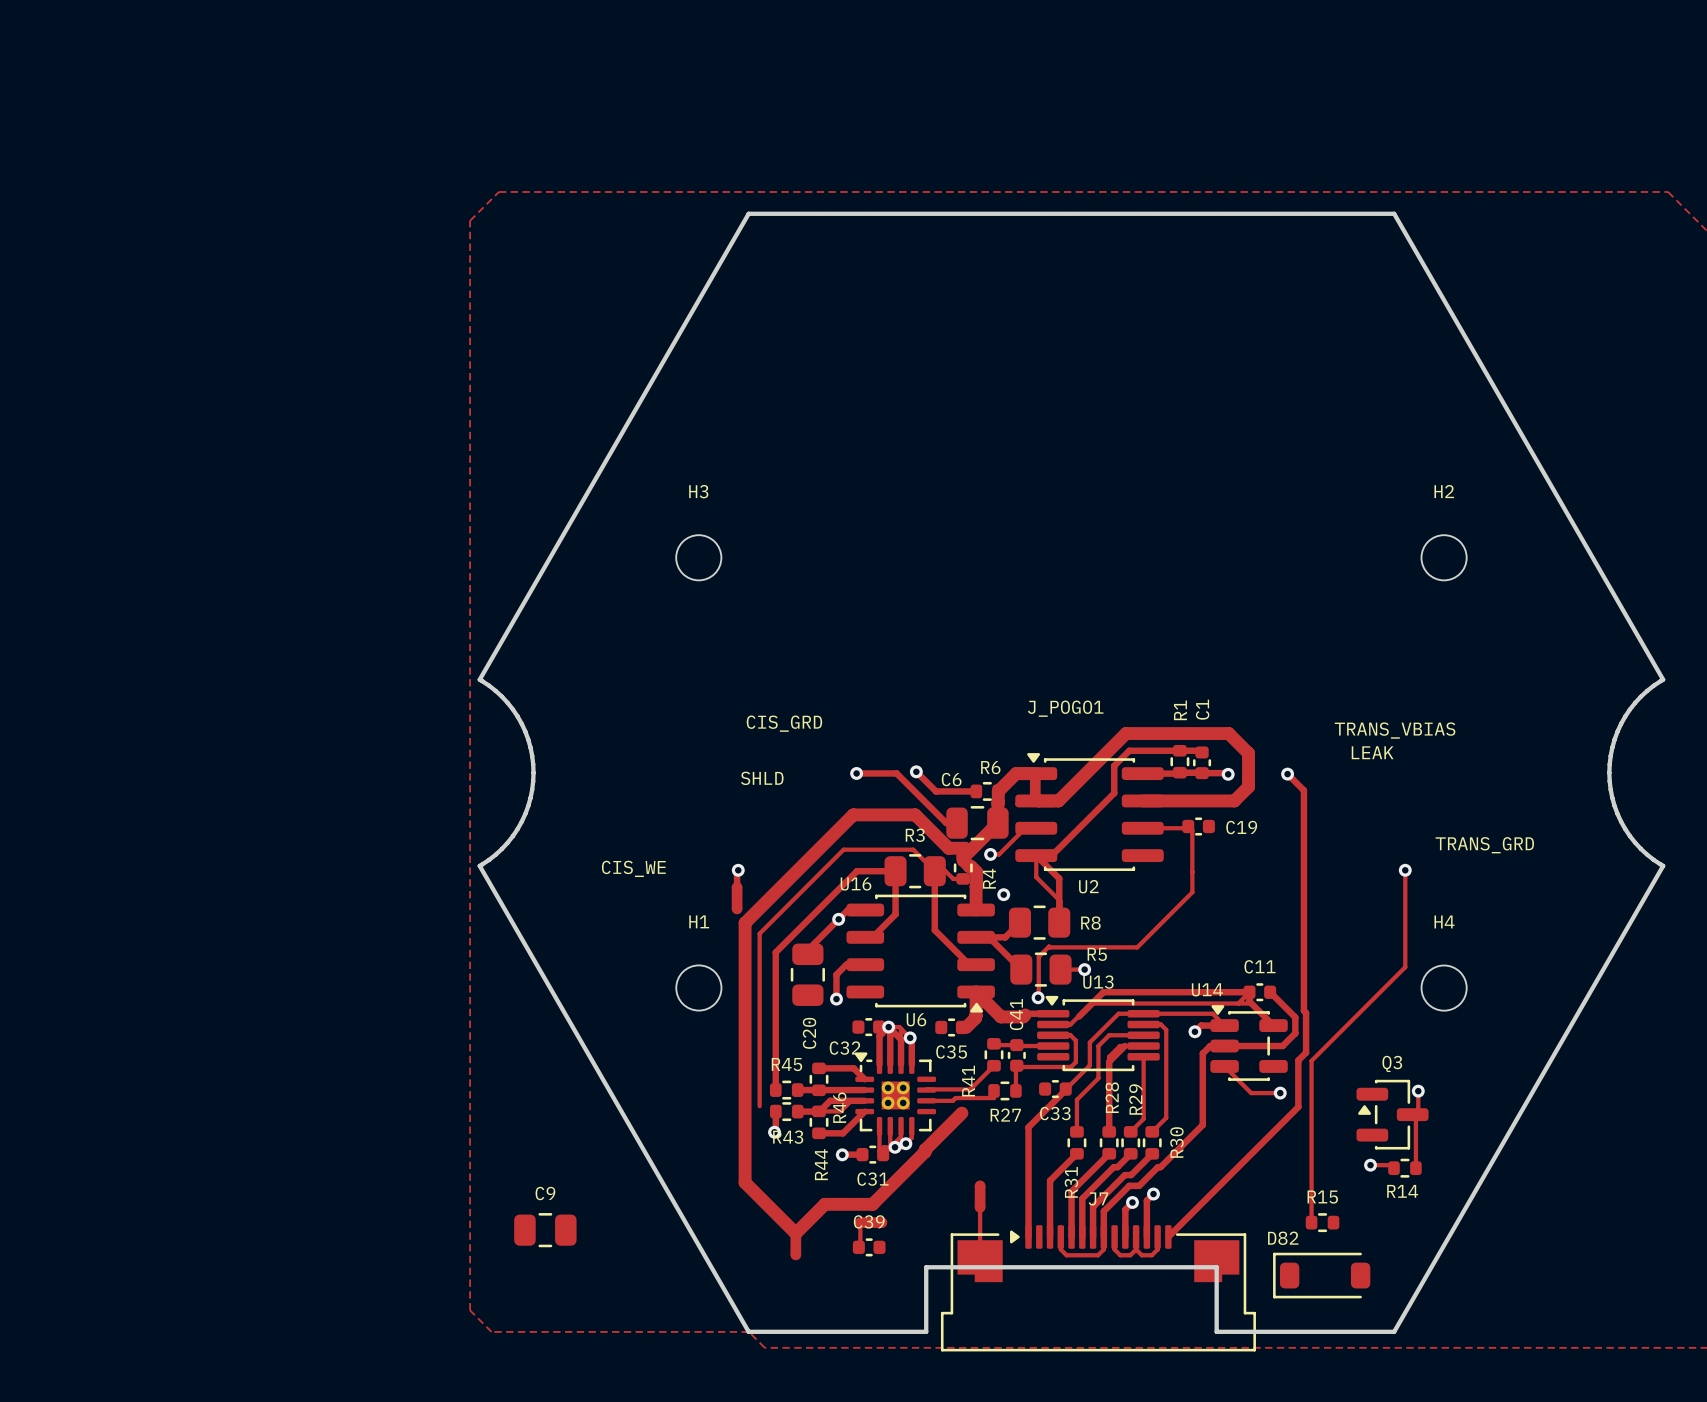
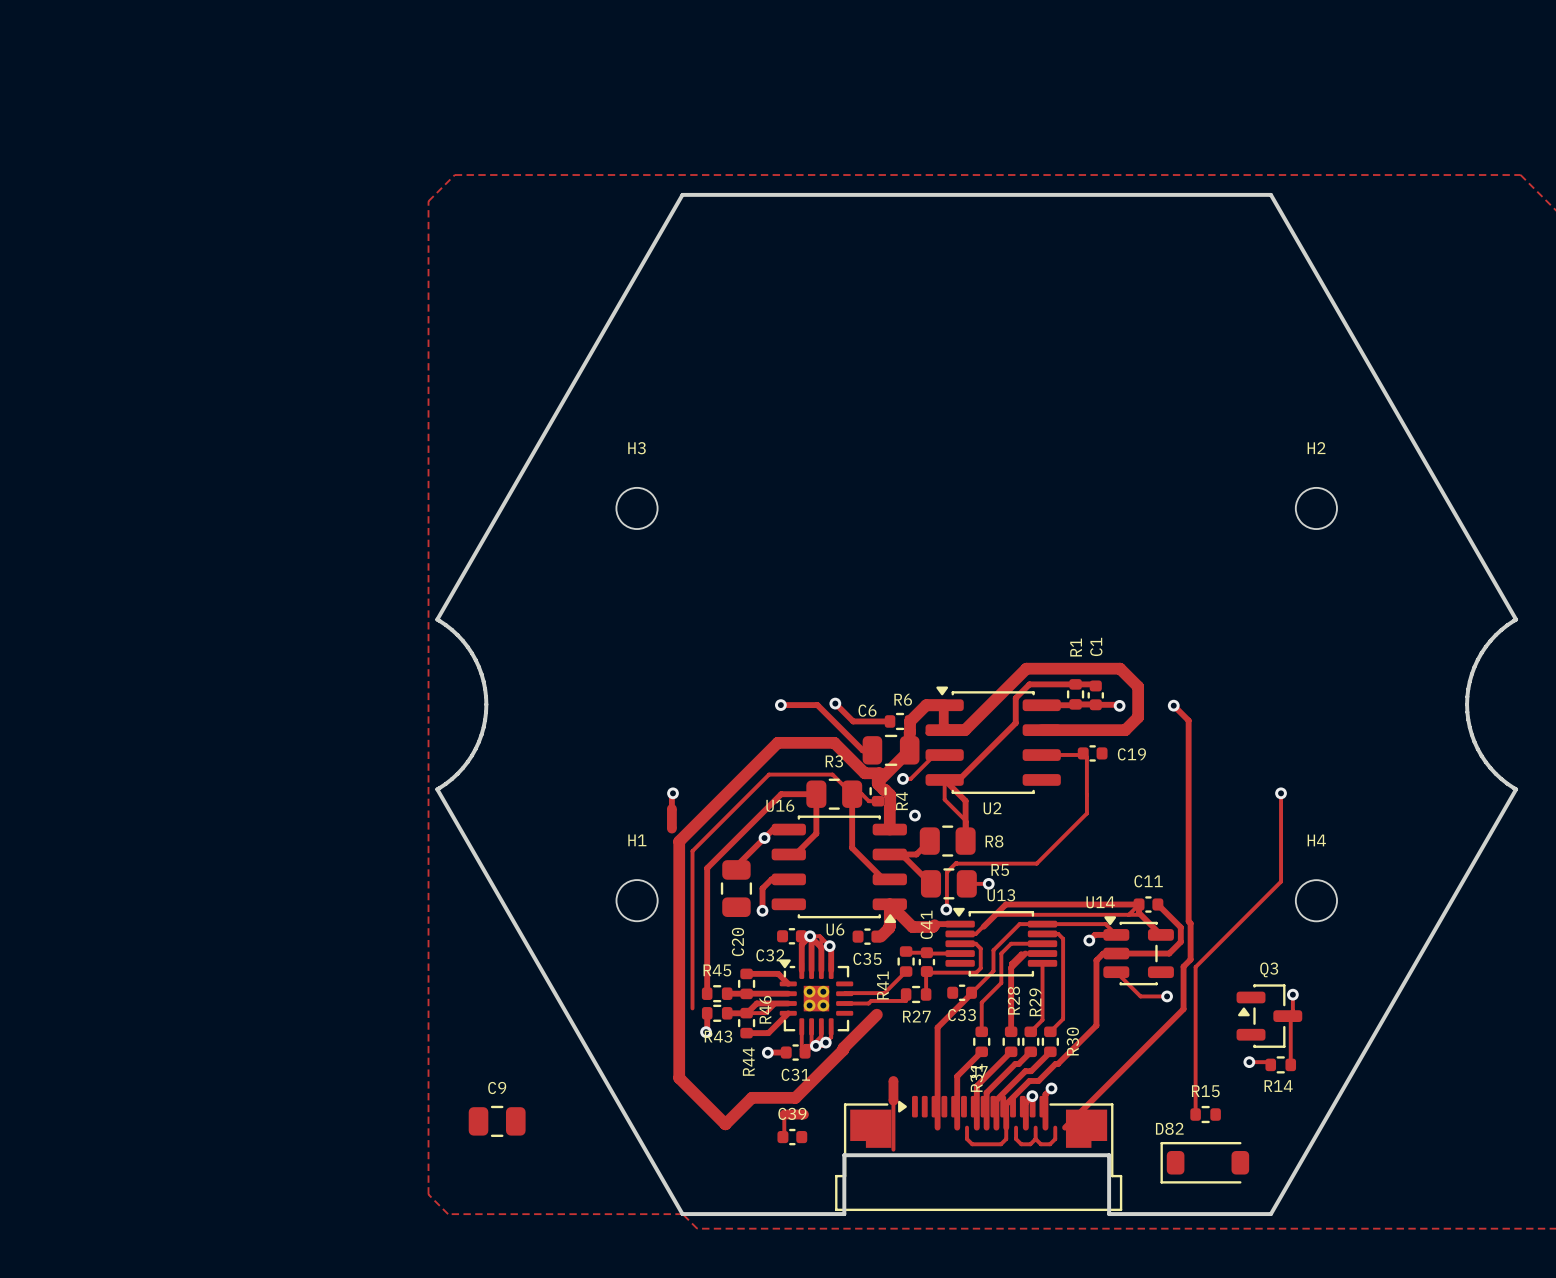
J_POGO1: (1067, 788) -> none
part: (795, 1244) -> none
J7 position: (1098, 1288) -> (978, 1153)

